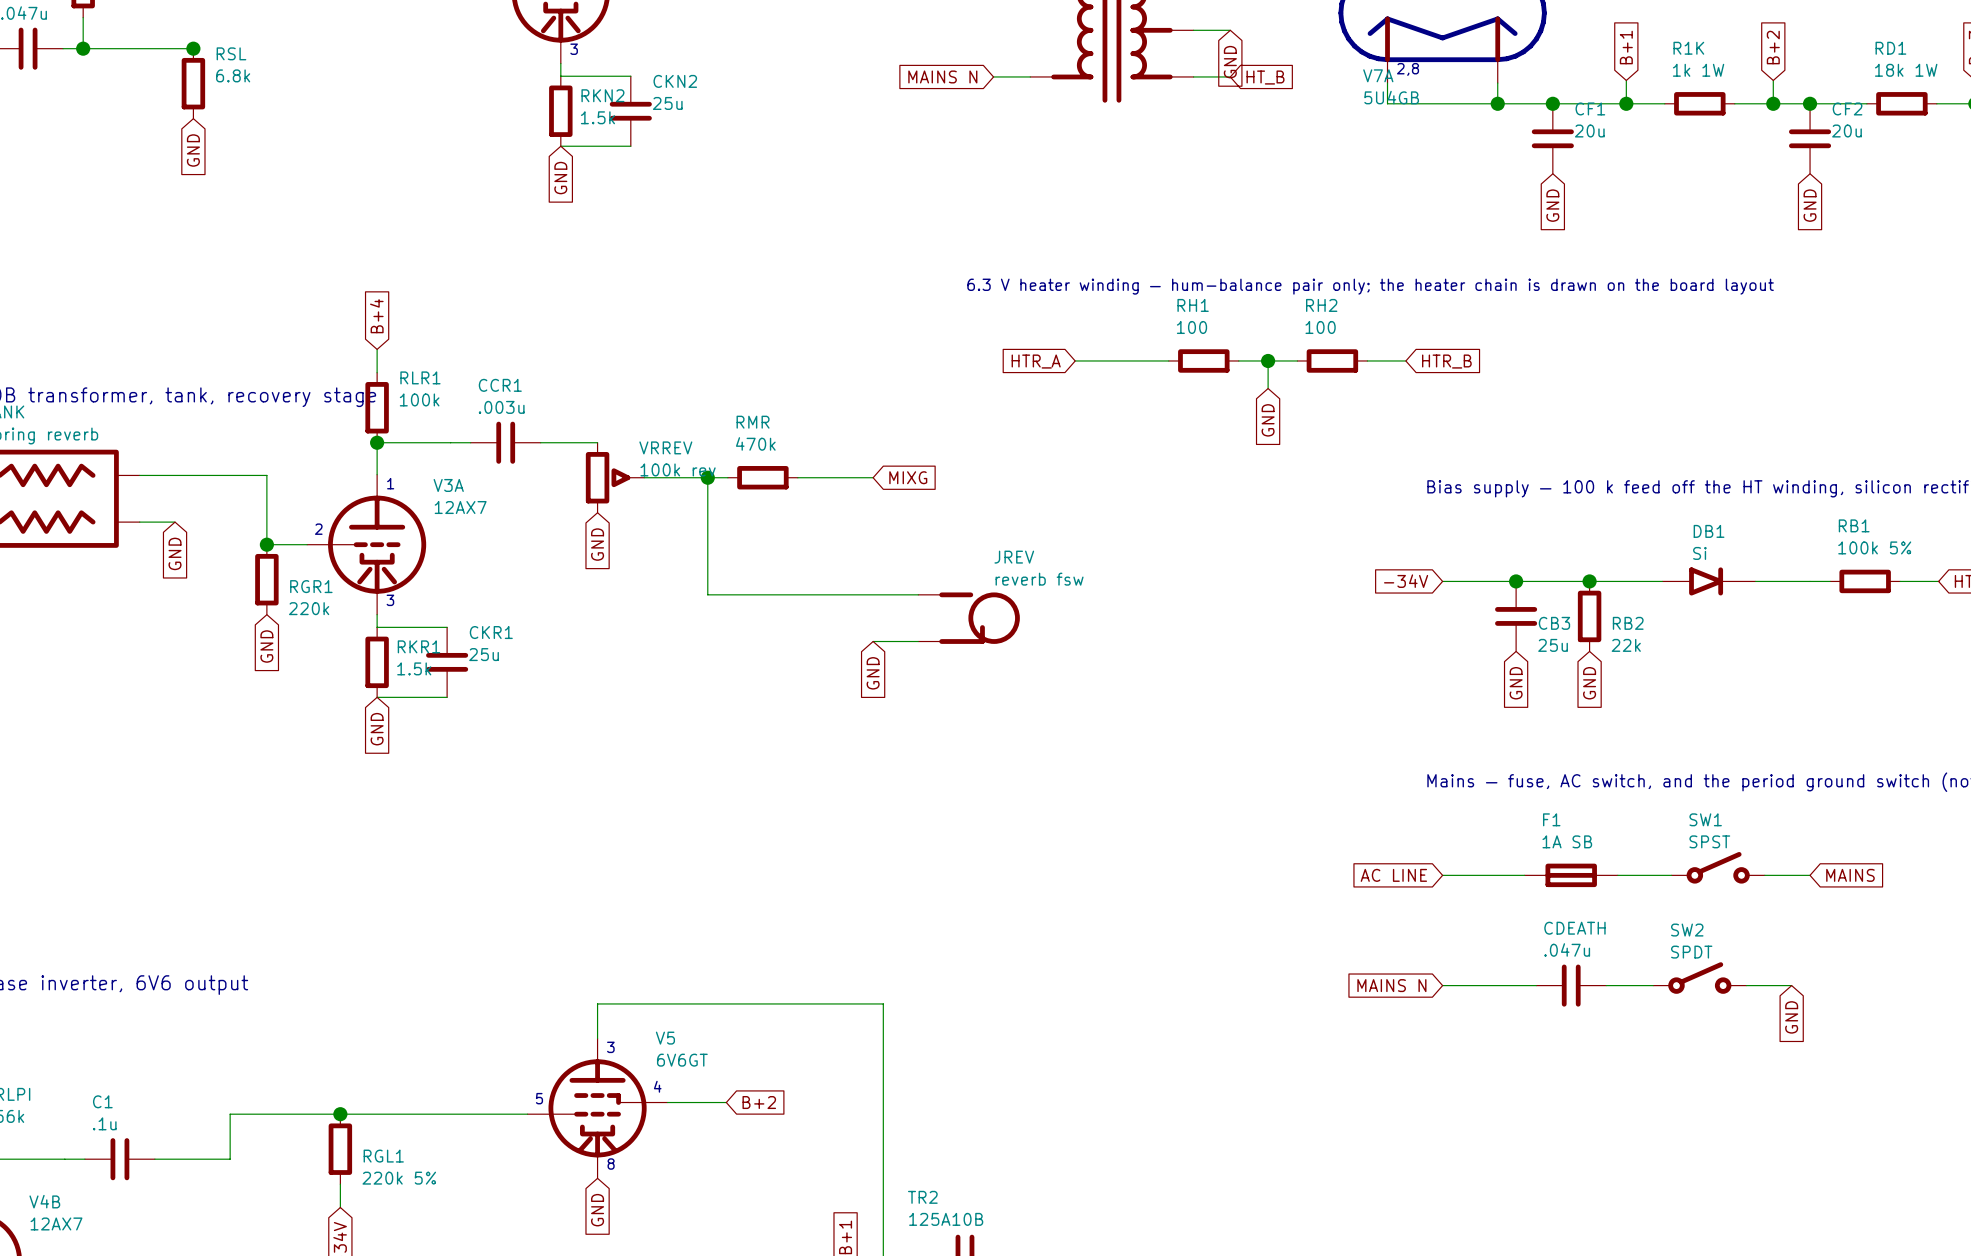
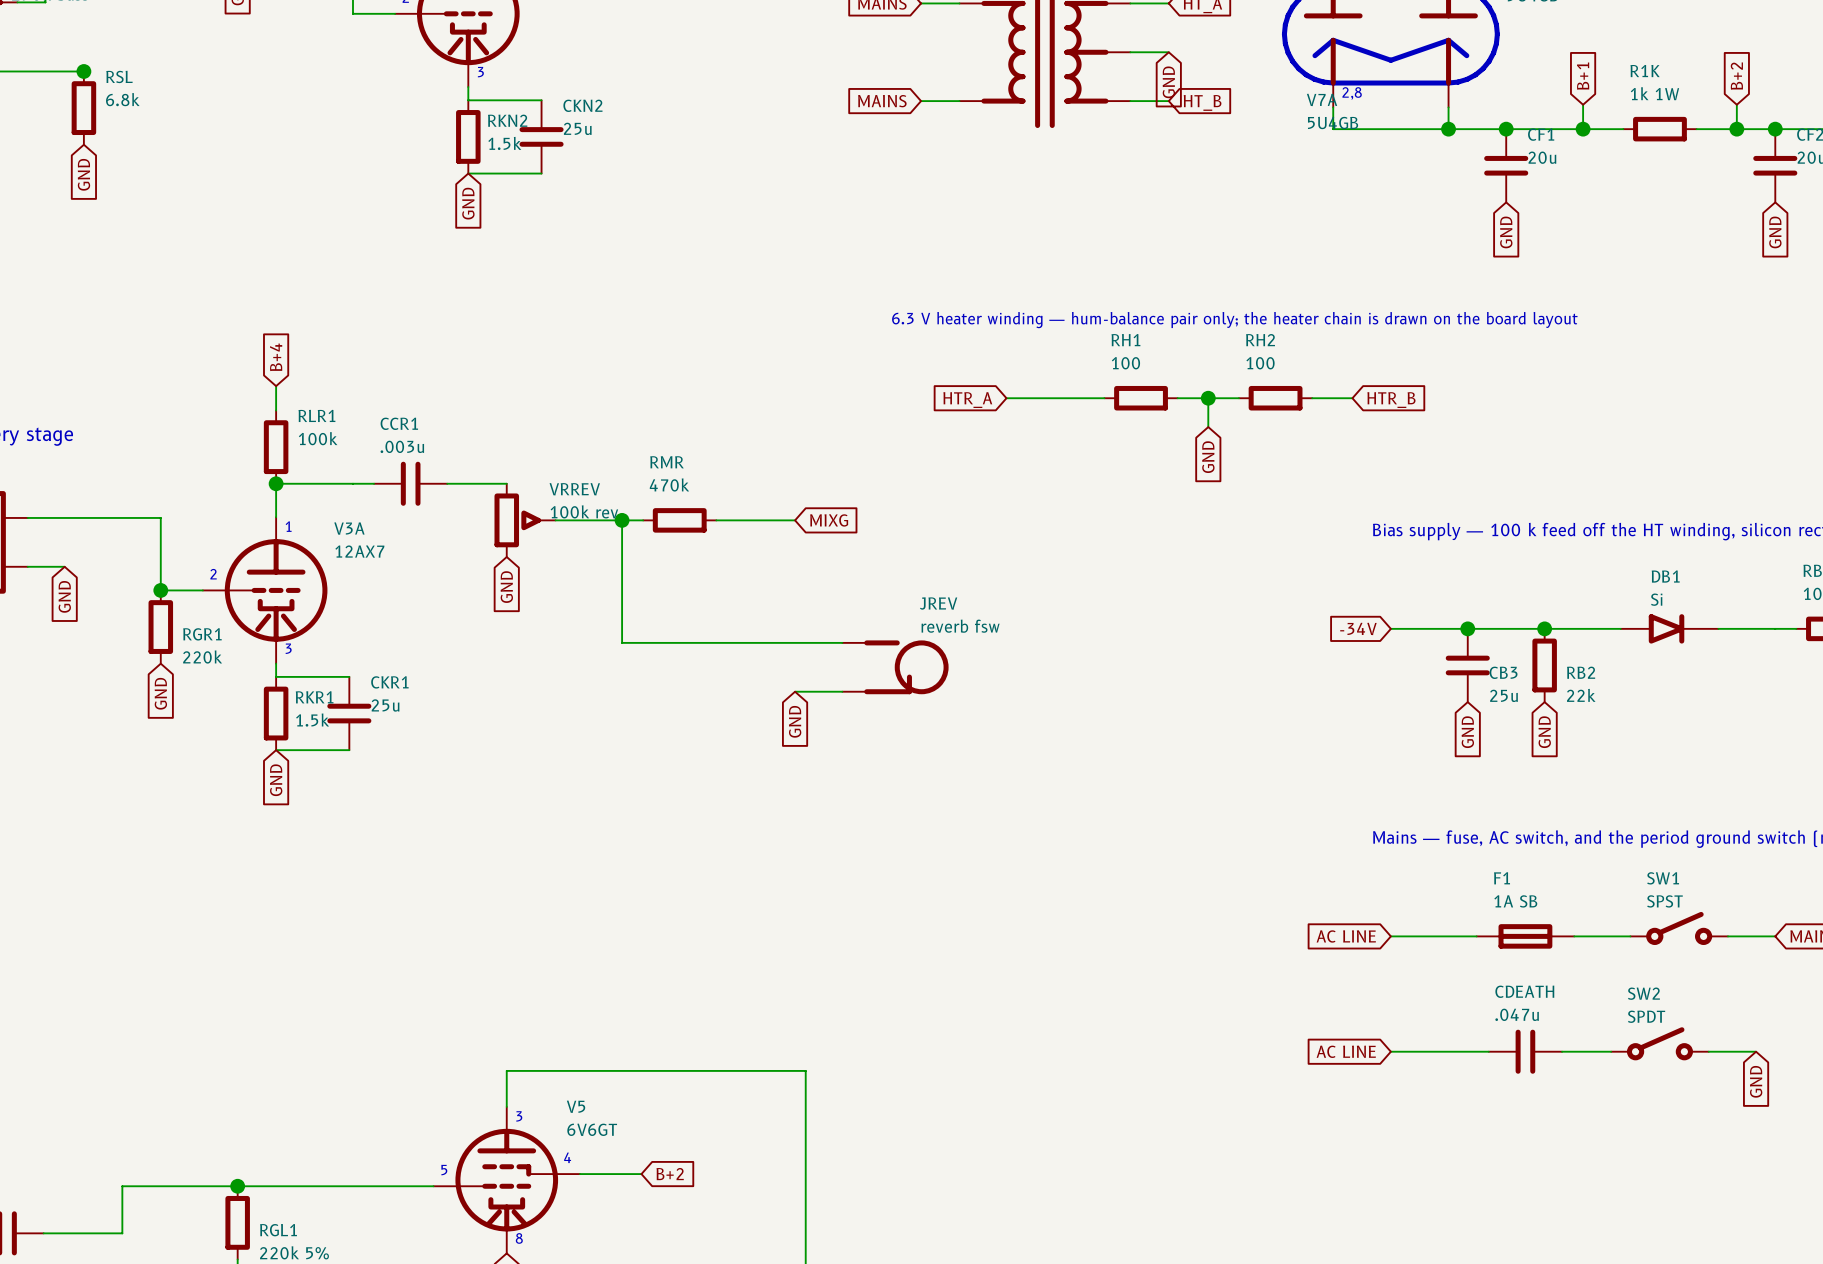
global label: MAINS N (942, 76) -> MAINS (882, 101)
global label: MAINS N (1391, 985) -> AC LINE (1346, 1051)

